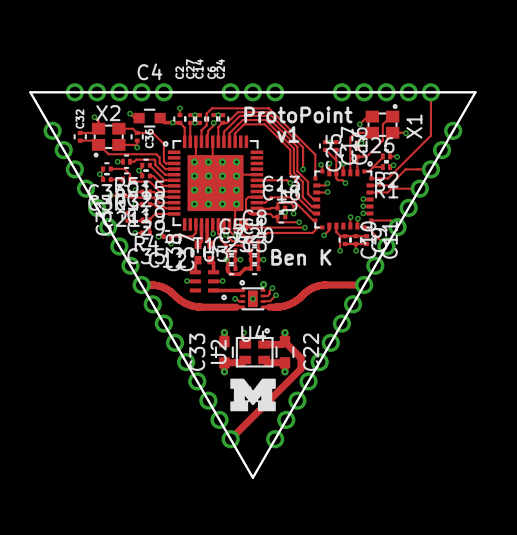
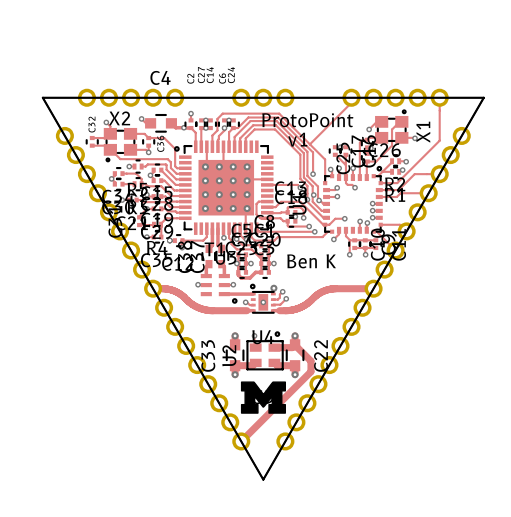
track: none -> (351, 97) (351, 102) (309, 144)
via: none -> (313, 195)
via: none -> (307, 199)
via: none -> (319, 200)
track: none -> (344, 218) (335, 218) (329, 224) (325, 224)
via: none -> (344, 218)

